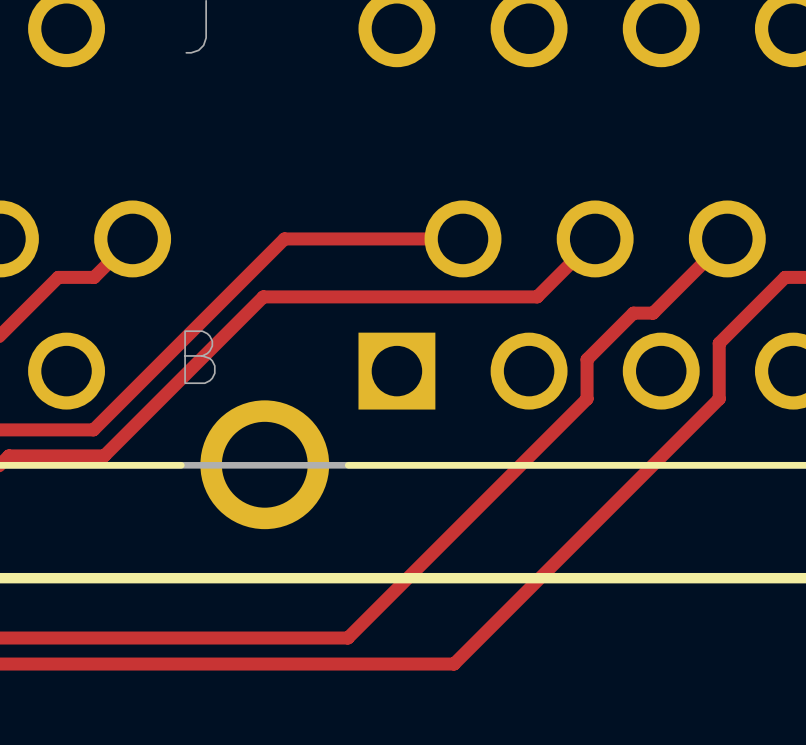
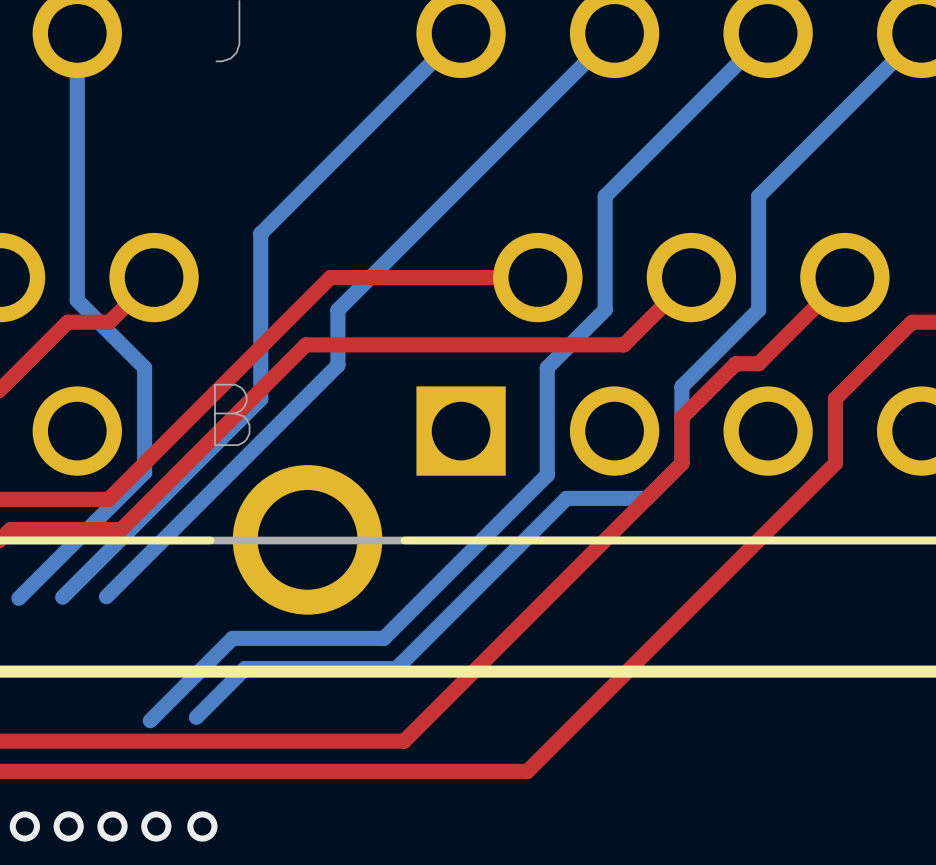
bottom track: none -> (77, 33) (77, 300) (144, 367) (144, 472) (18, 598)
bottom track: none -> (461, 33) (260, 233) (260, 399) (62, 597)
bottom track: none -> (614, 33) (337, 310) (337, 365) (106, 596)
bottom track: none -> (768, 33) (605, 196) (605, 309) (547, 367) (547, 475) (383, 638) (232, 638) (150, 720)
bottom track: none -> (921, 33) (758, 196) (758, 309) (681, 386) (681, 463) (646, 498) (566, 498) (396, 668) (245, 668) (196, 717)
via: none -> (24, 826)
via: none -> (68, 826)
via: none -> (112, 826)
via: none -> (156, 826)
via: none -> (202, 826)

